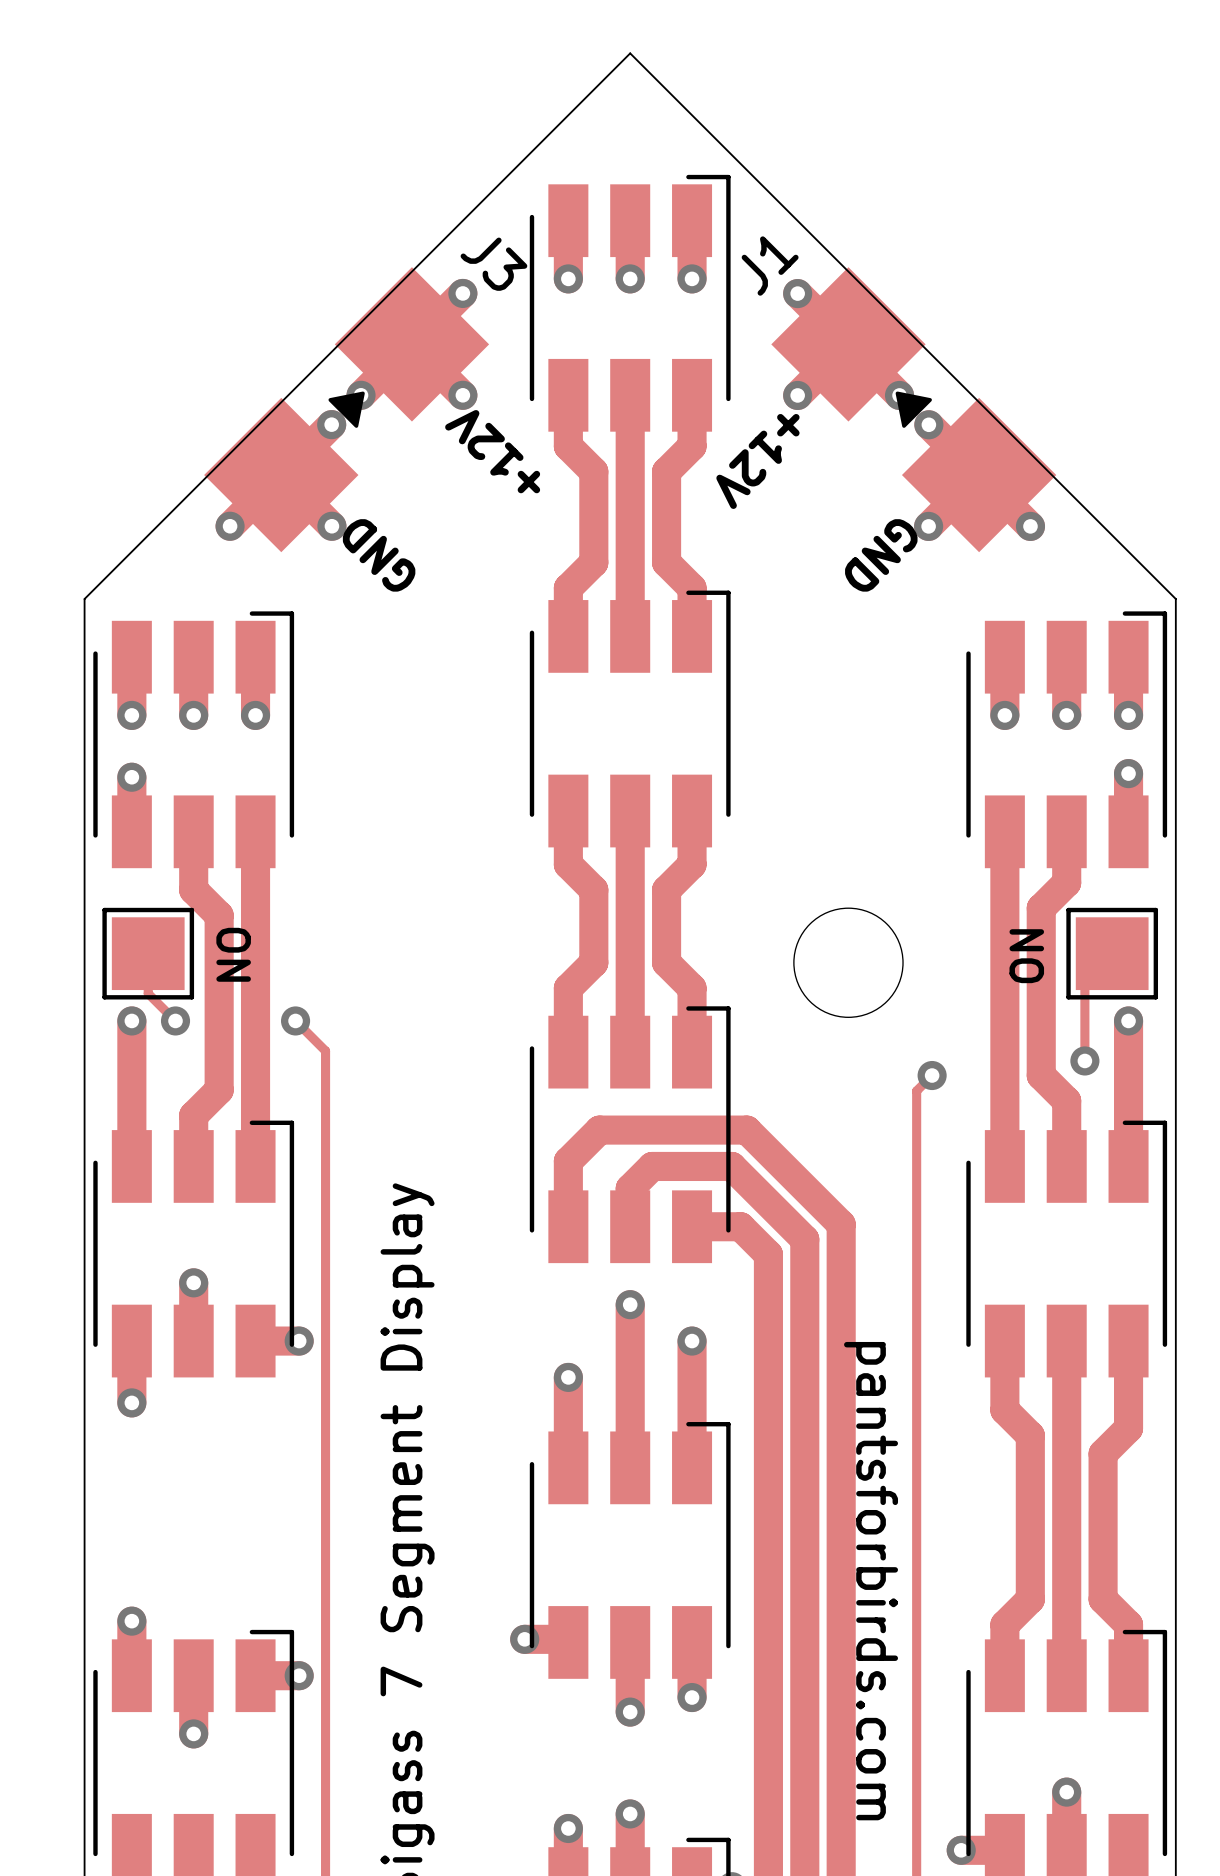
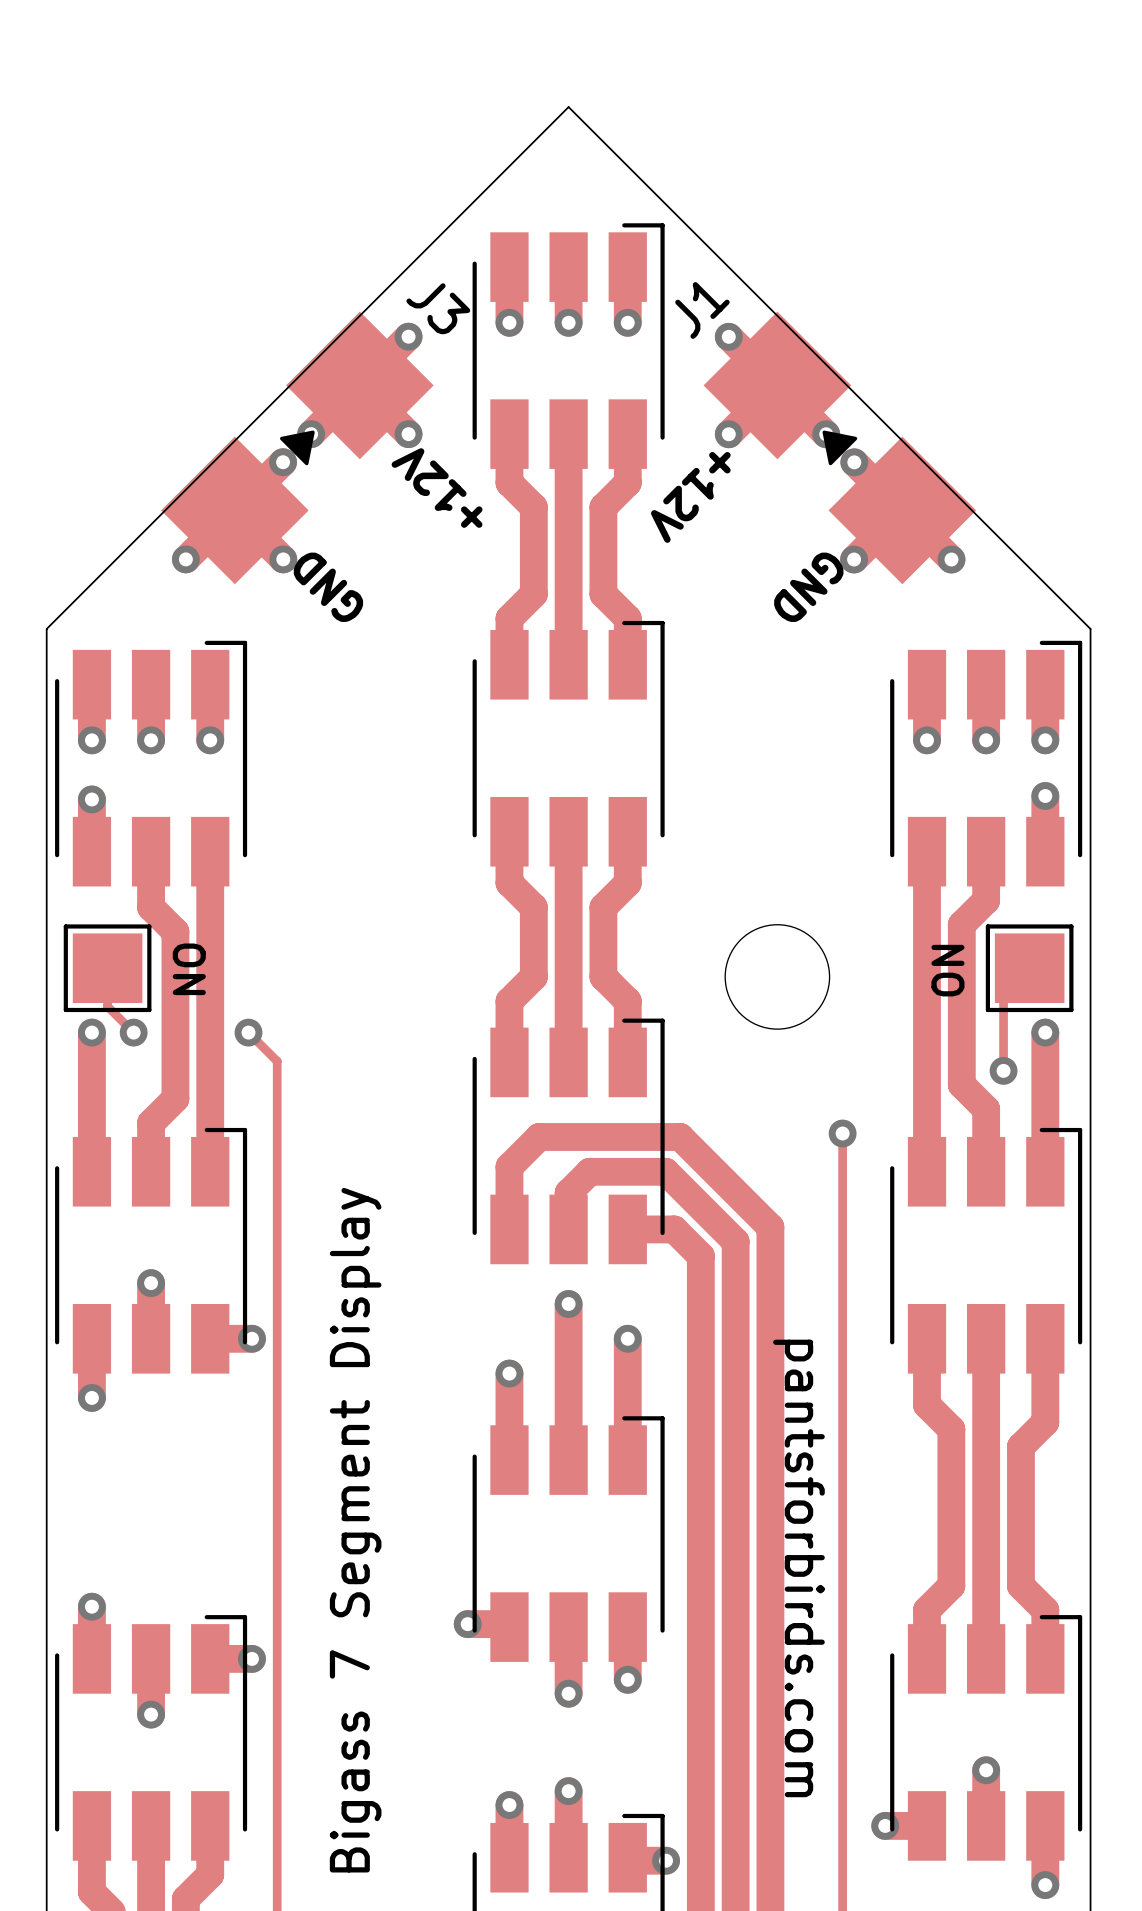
track: (932, 1075) (916, 1090) (916, 1126) -> none
via position: (932, 1075) -> (842, 1133)

